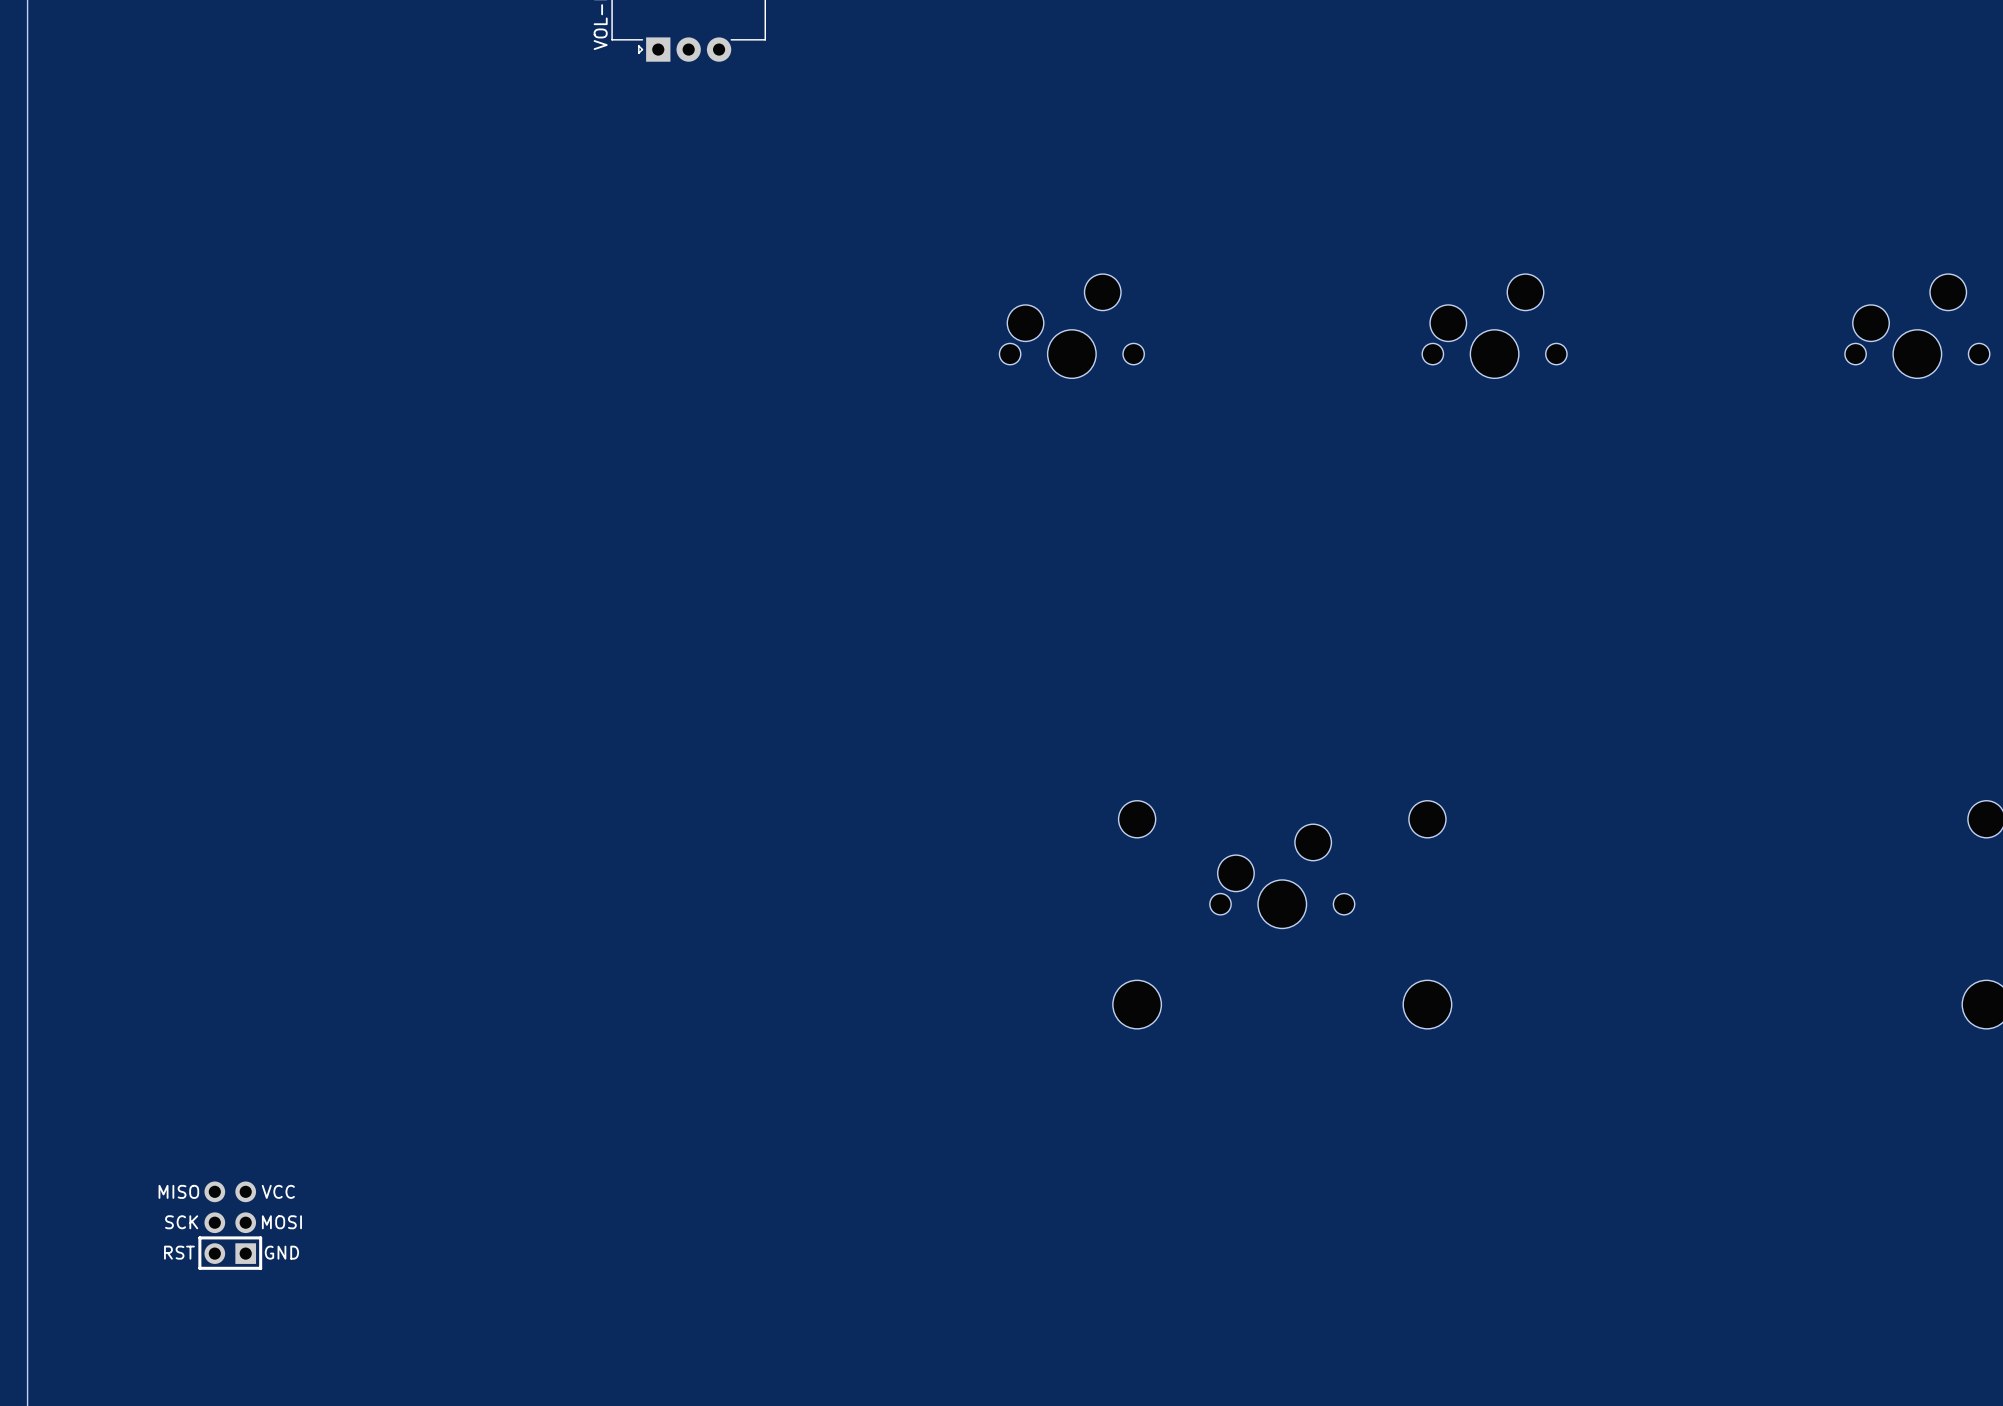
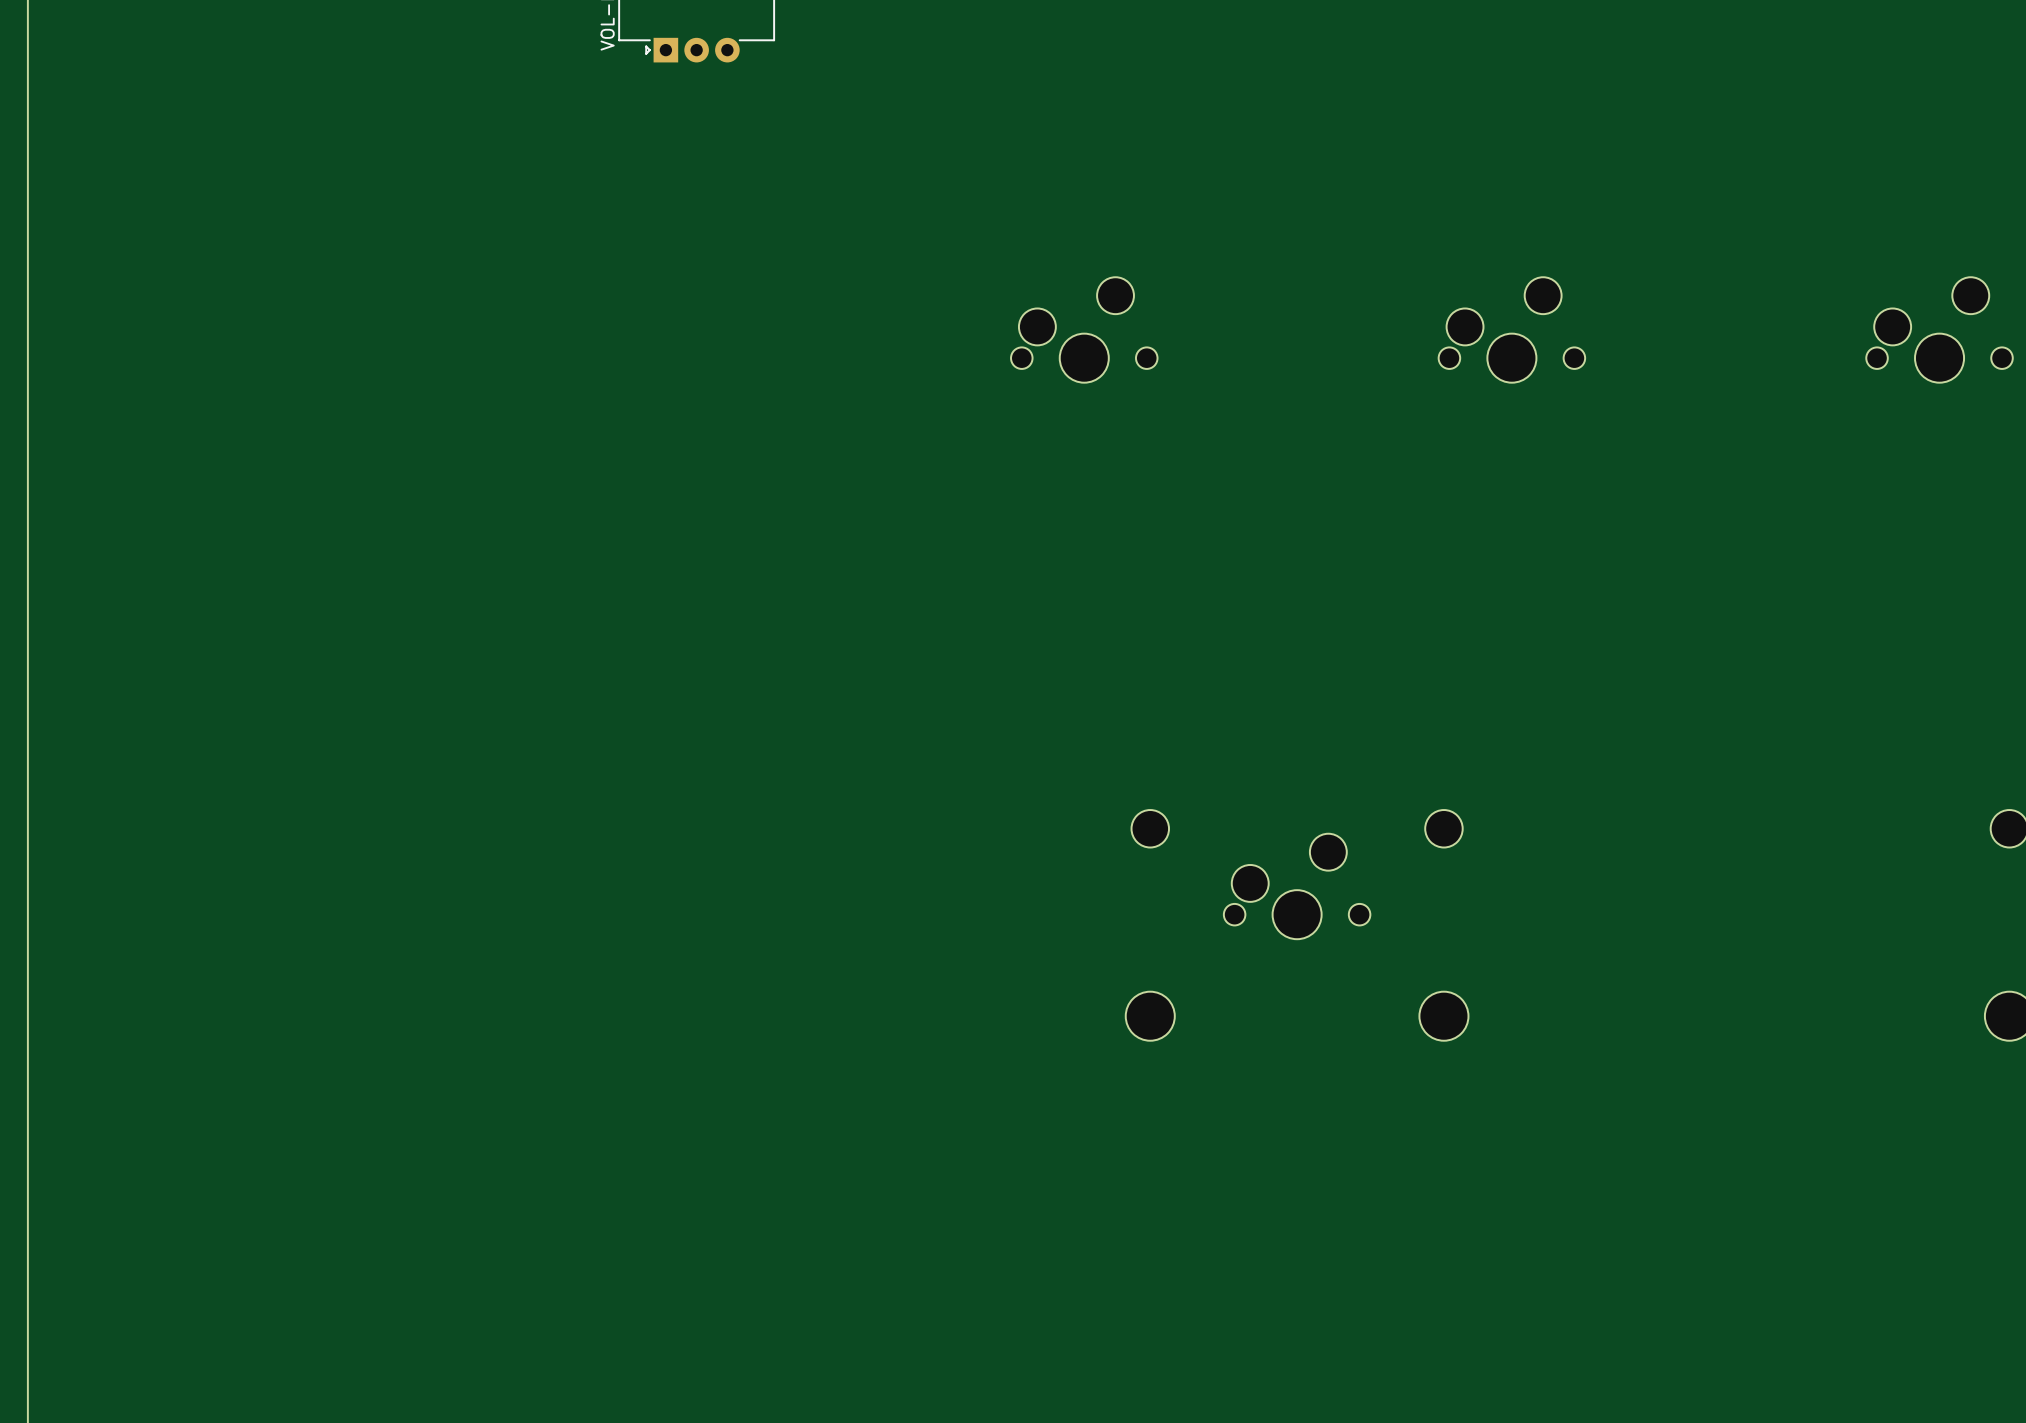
part: (230, 1225) -> none

